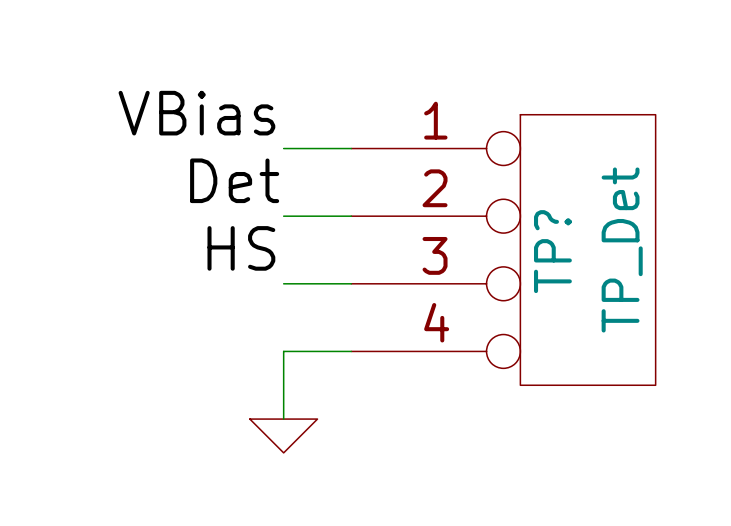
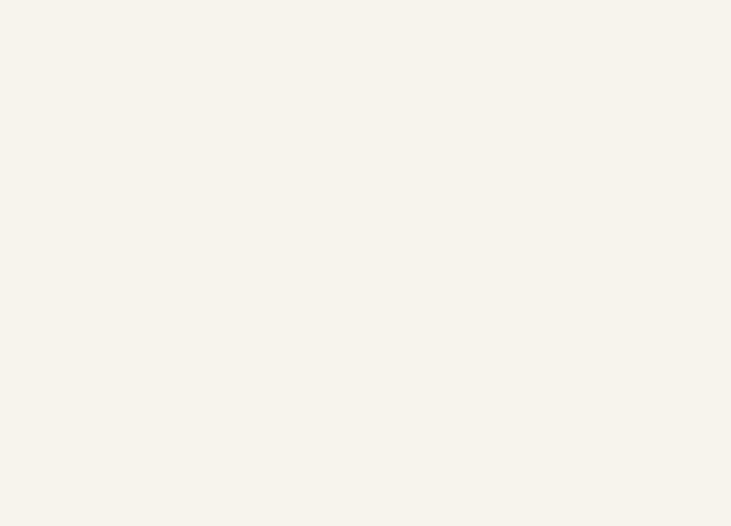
label: VBias (196, 113) -> none
wire: (283, 148) (351, 148) -> none
label: Det (234, 180) -> none
wire: (283, 216) (351, 216) -> none
label: HS (241, 248) -> none
TP?: TP_Det (503, 249) -> none
wire: (283, 283) (351, 283) -> none
wire: (351, 351) (283, 351) (283, 419) -> none
power symbol: (283, 435) -> none

